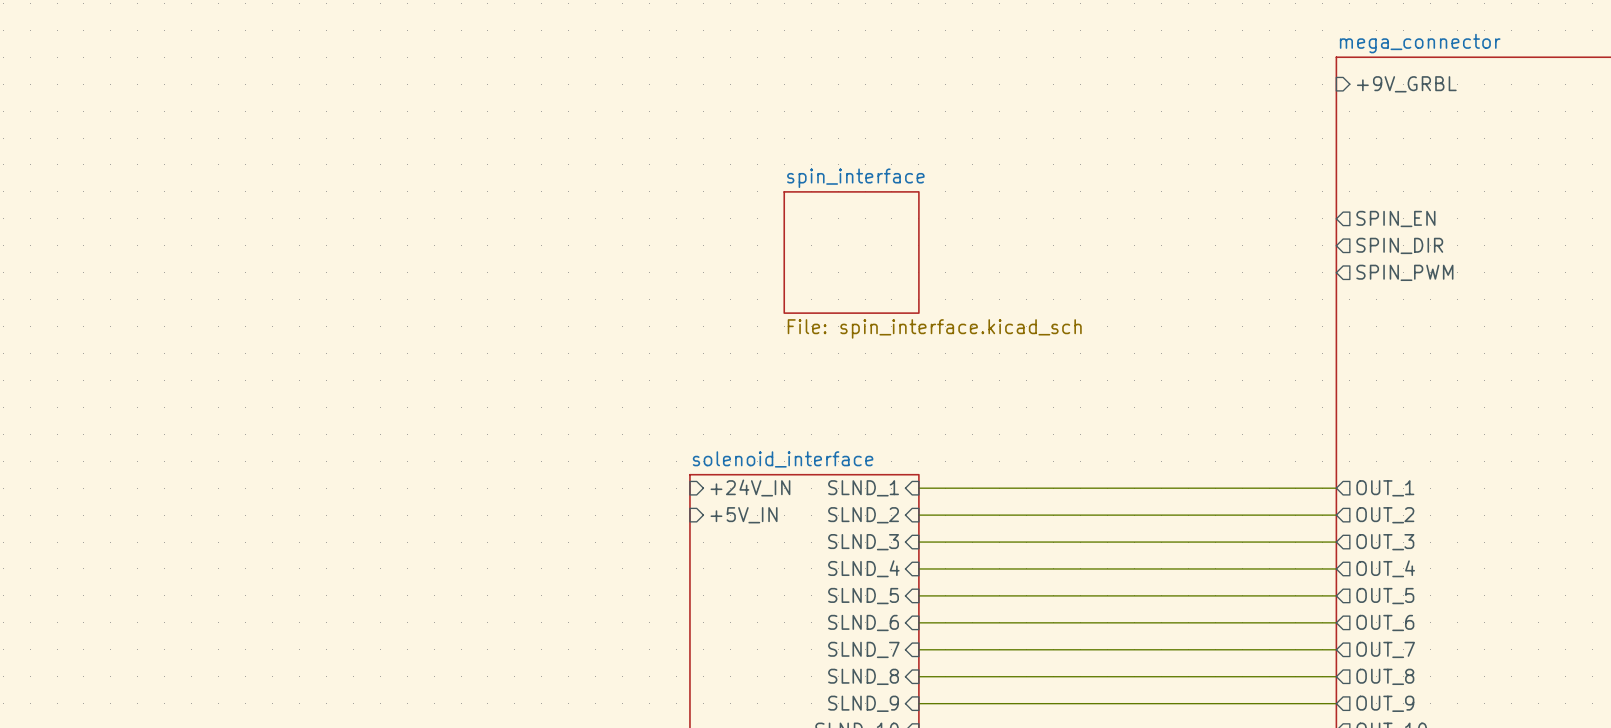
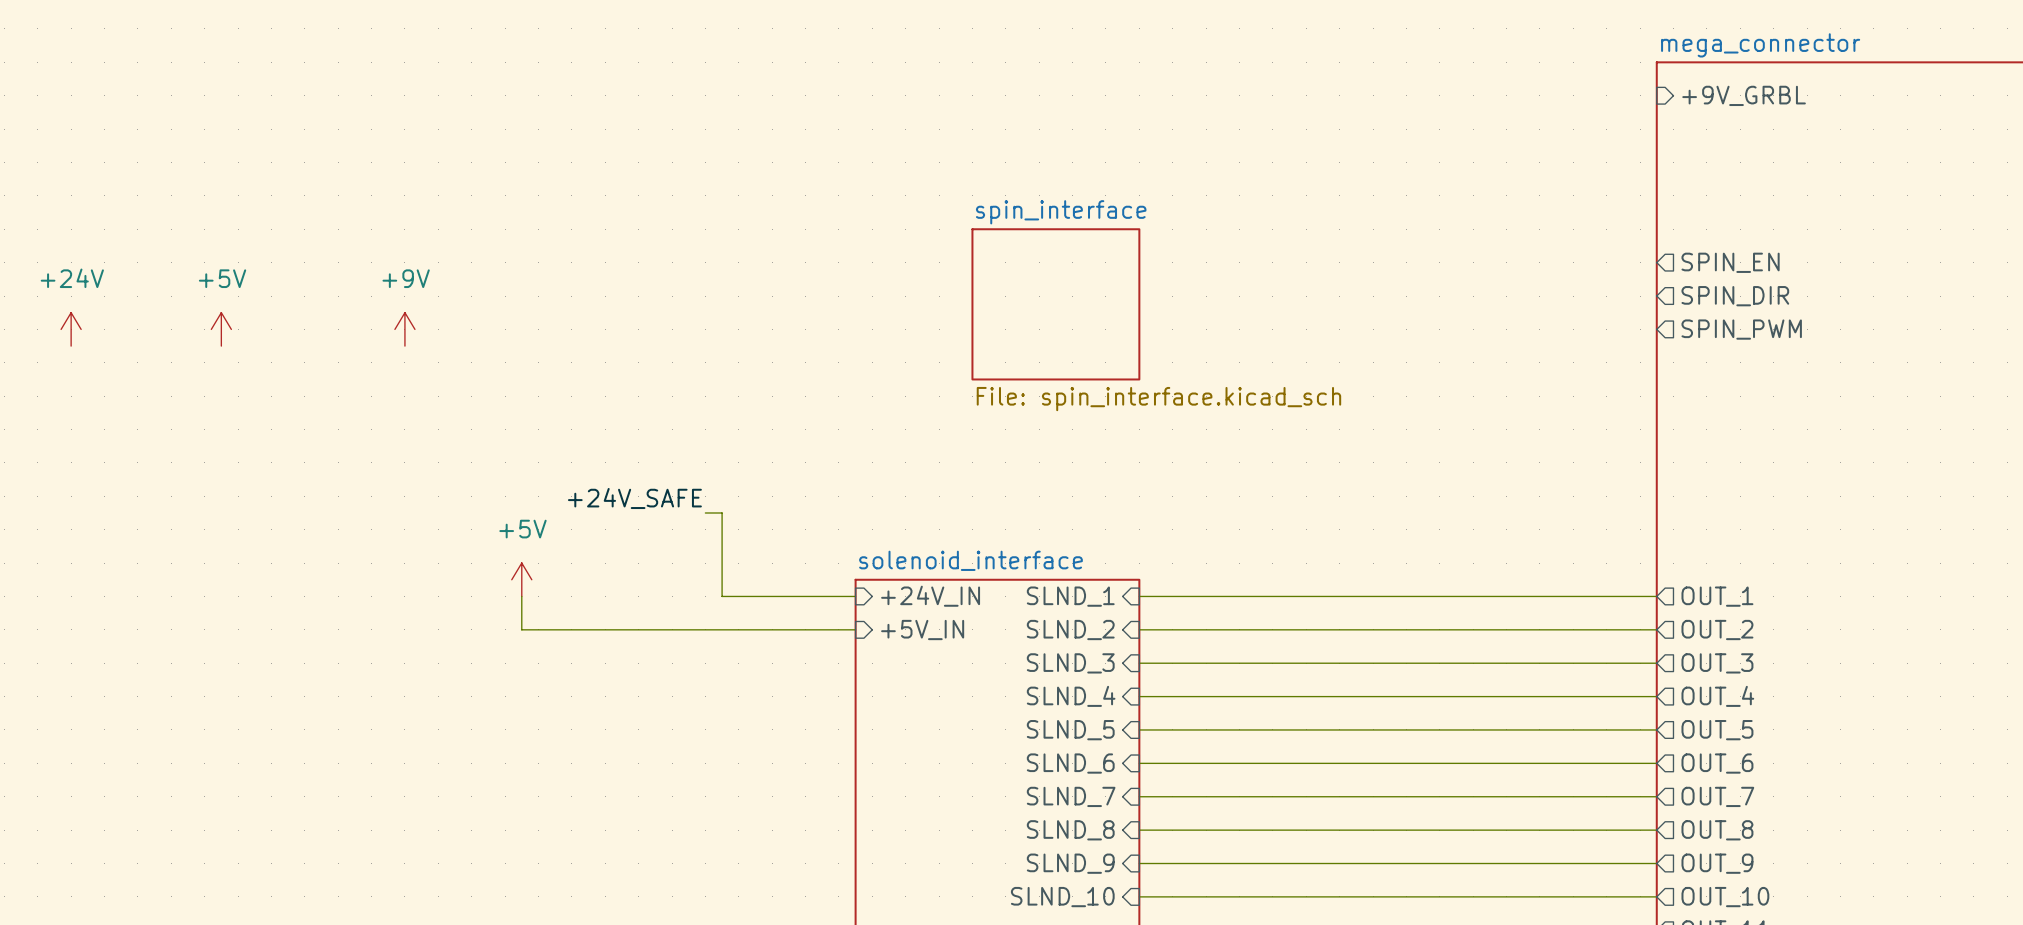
power symbol: none -> +24V (71, 329)
power symbol: none -> +5V (221, 329)
power symbol: none -> +9V (404, 329)
label: none -> +24V_SAFE (634, 498)
wire: none -> (705, 512) (722, 512) (722, 596) (855, 596)
power symbol: none -> +5V (521, 579)
wire: none -> (521, 596) (521, 629) (855, 629)

